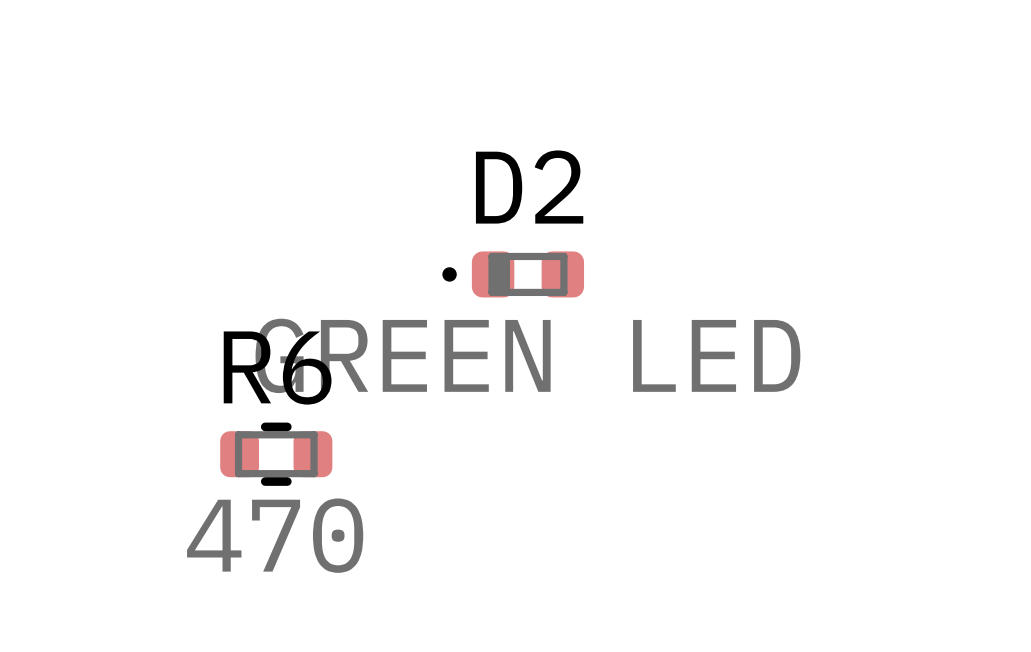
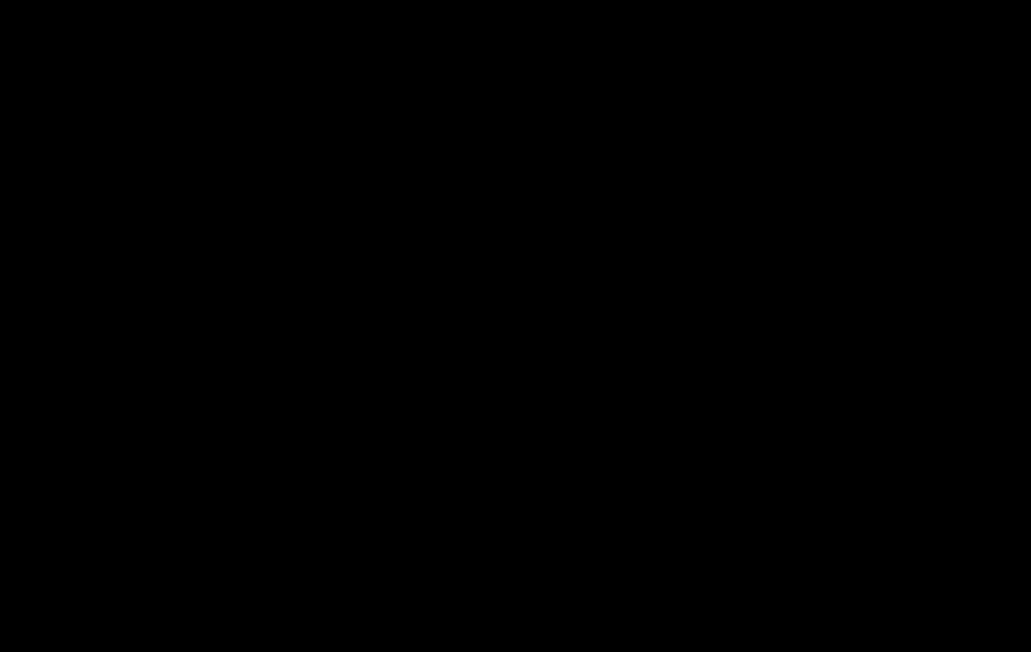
D2: GREEN LED (513, 274) -> none
R6: 470 (276, 454) -> none

